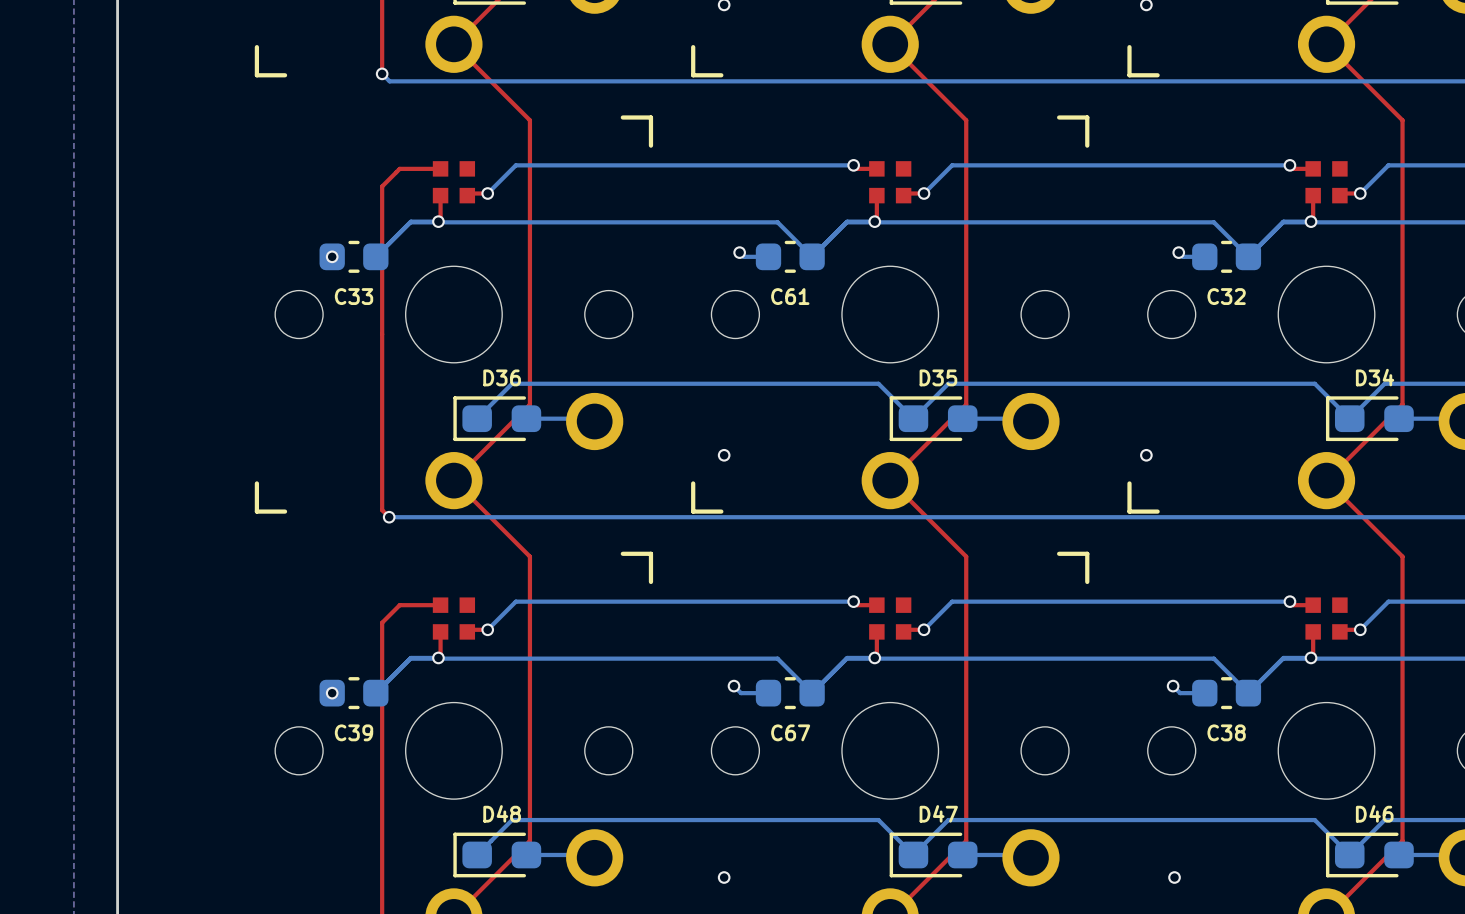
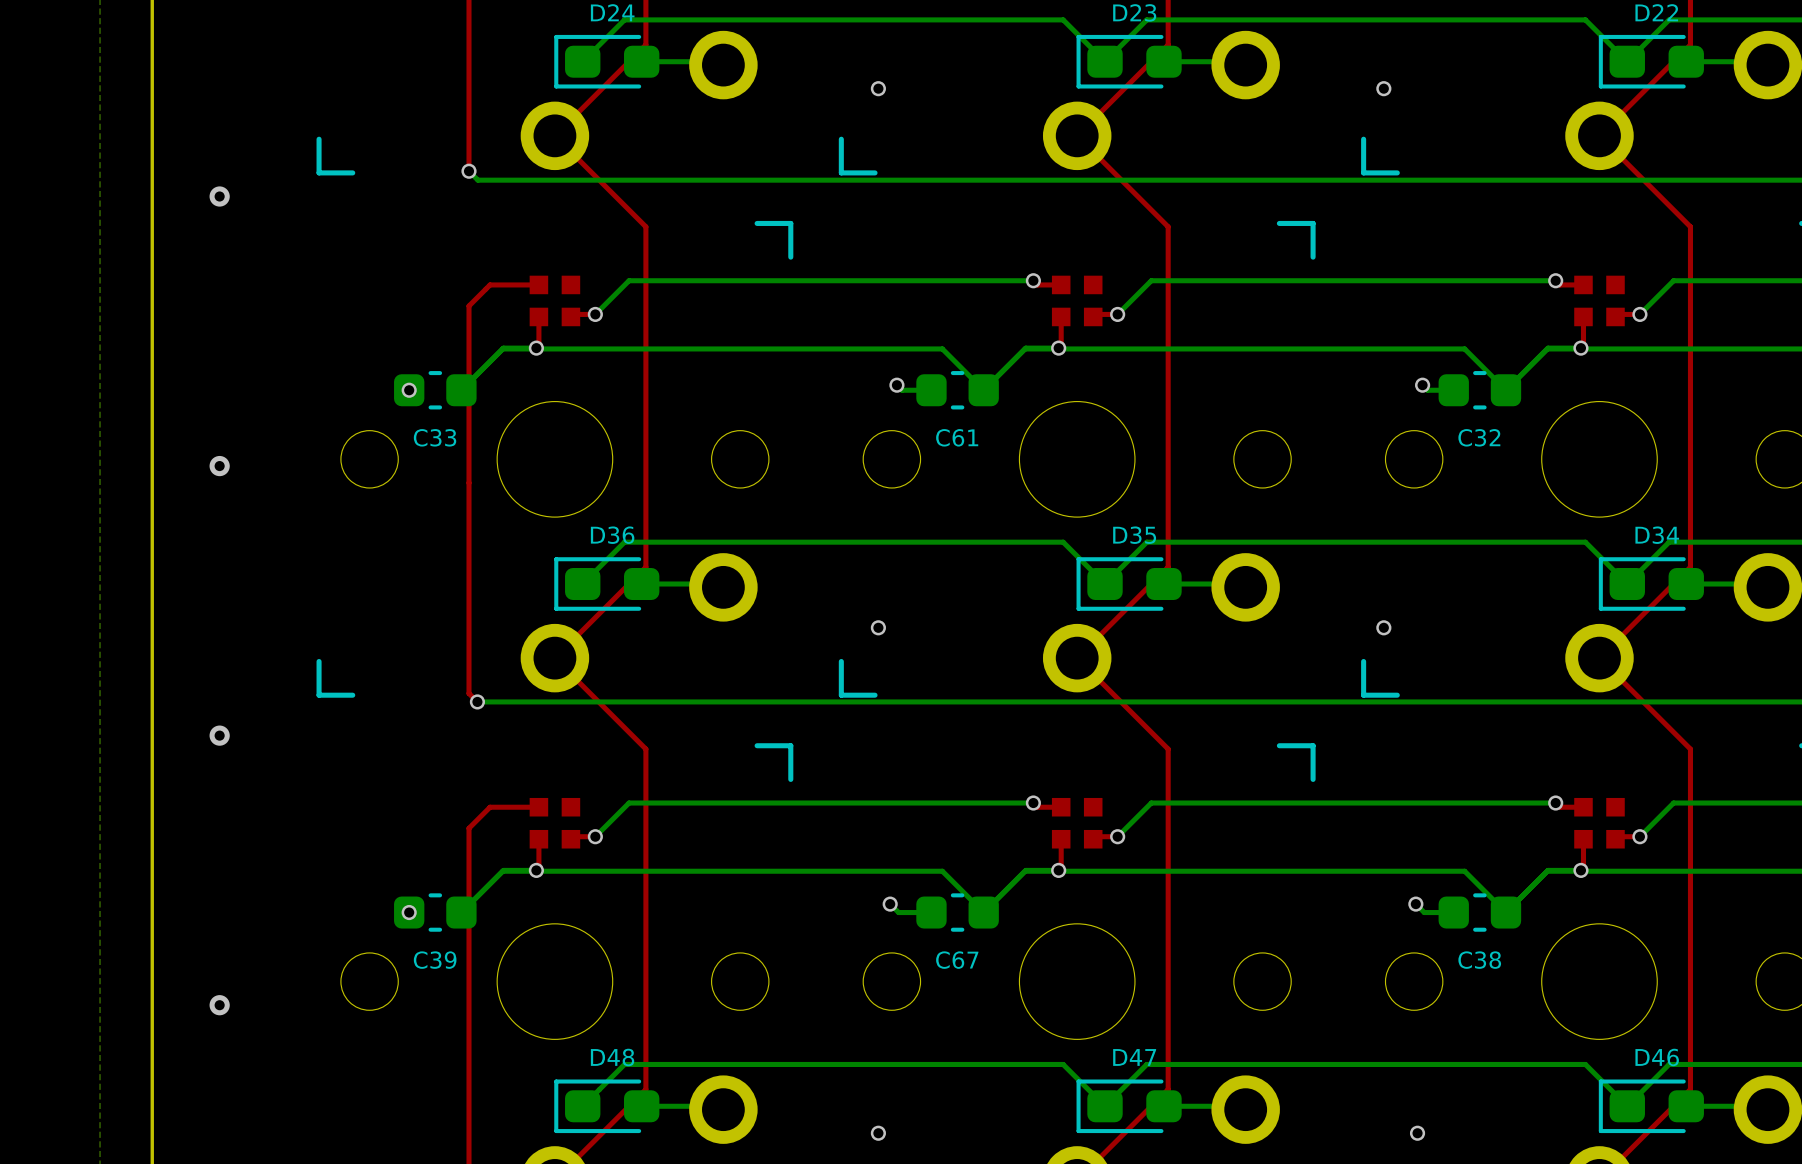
via: none -> (219, 196)
via: none -> (219, 466)
via: none -> (219, 735)
via: none -> (219, 1005)

